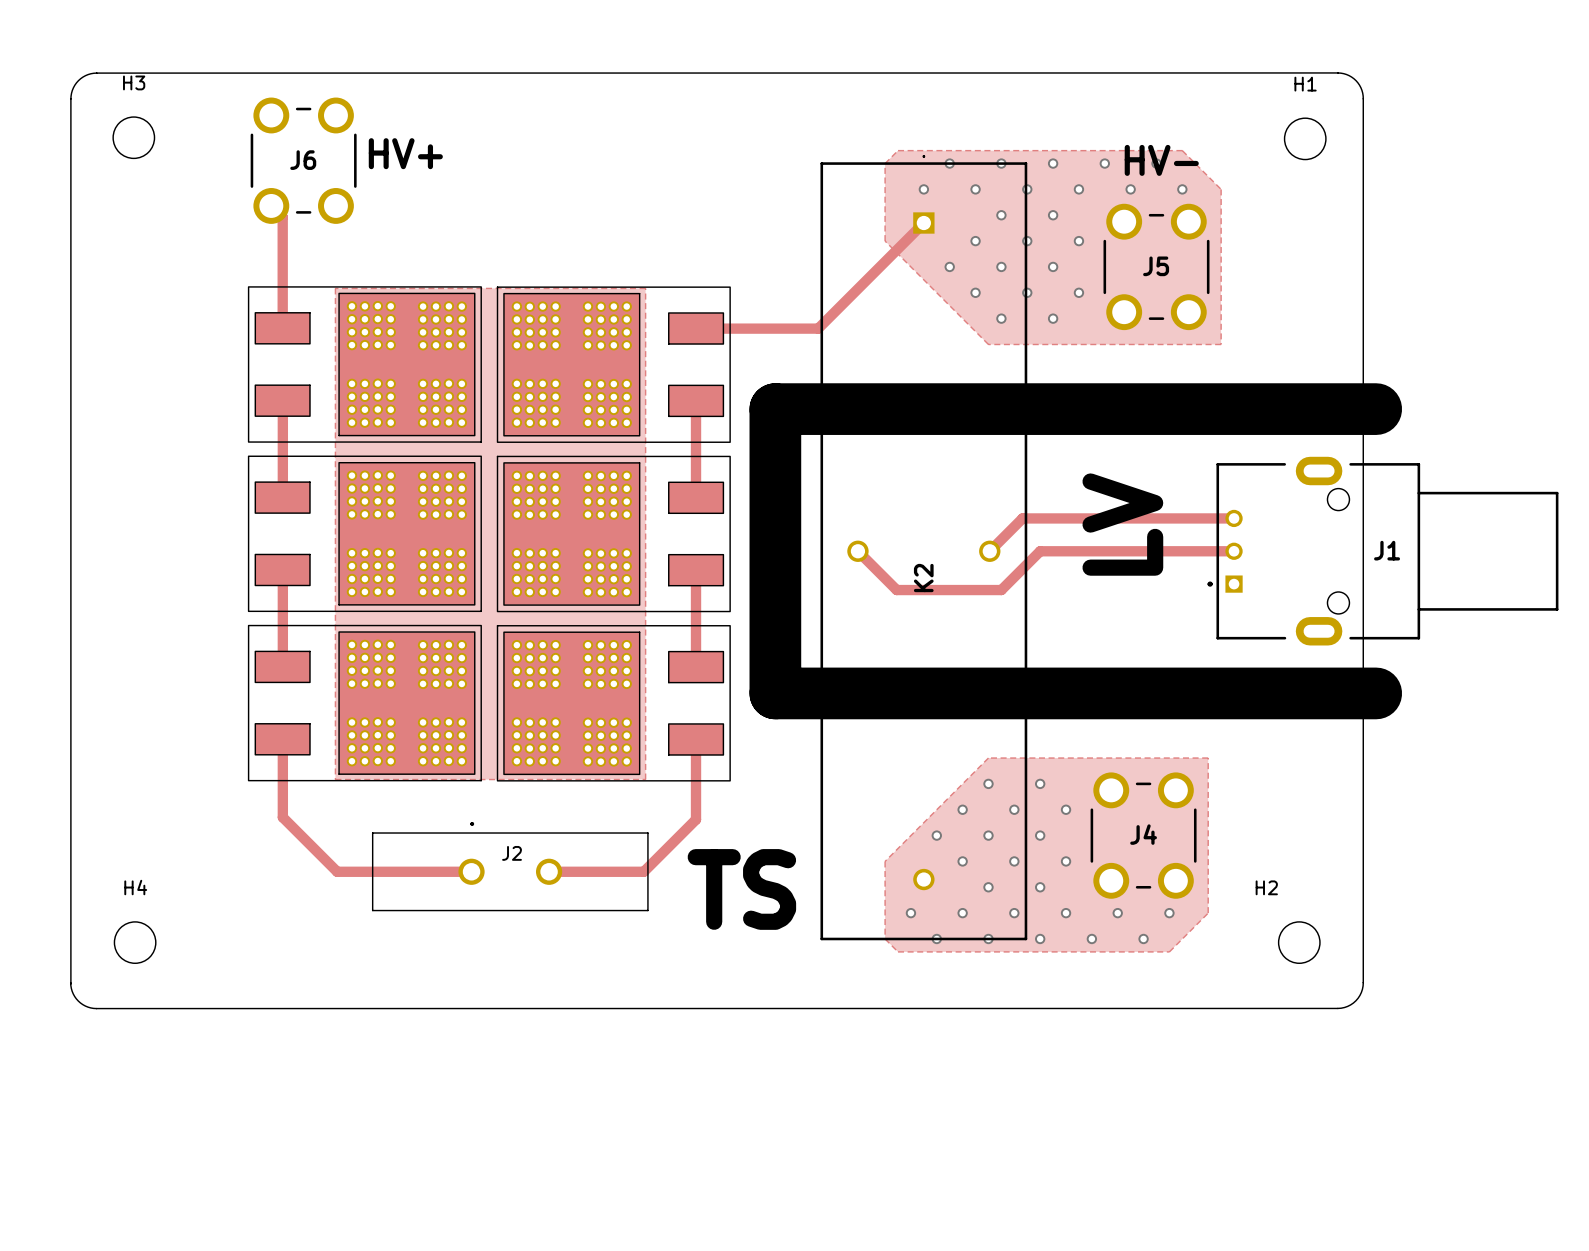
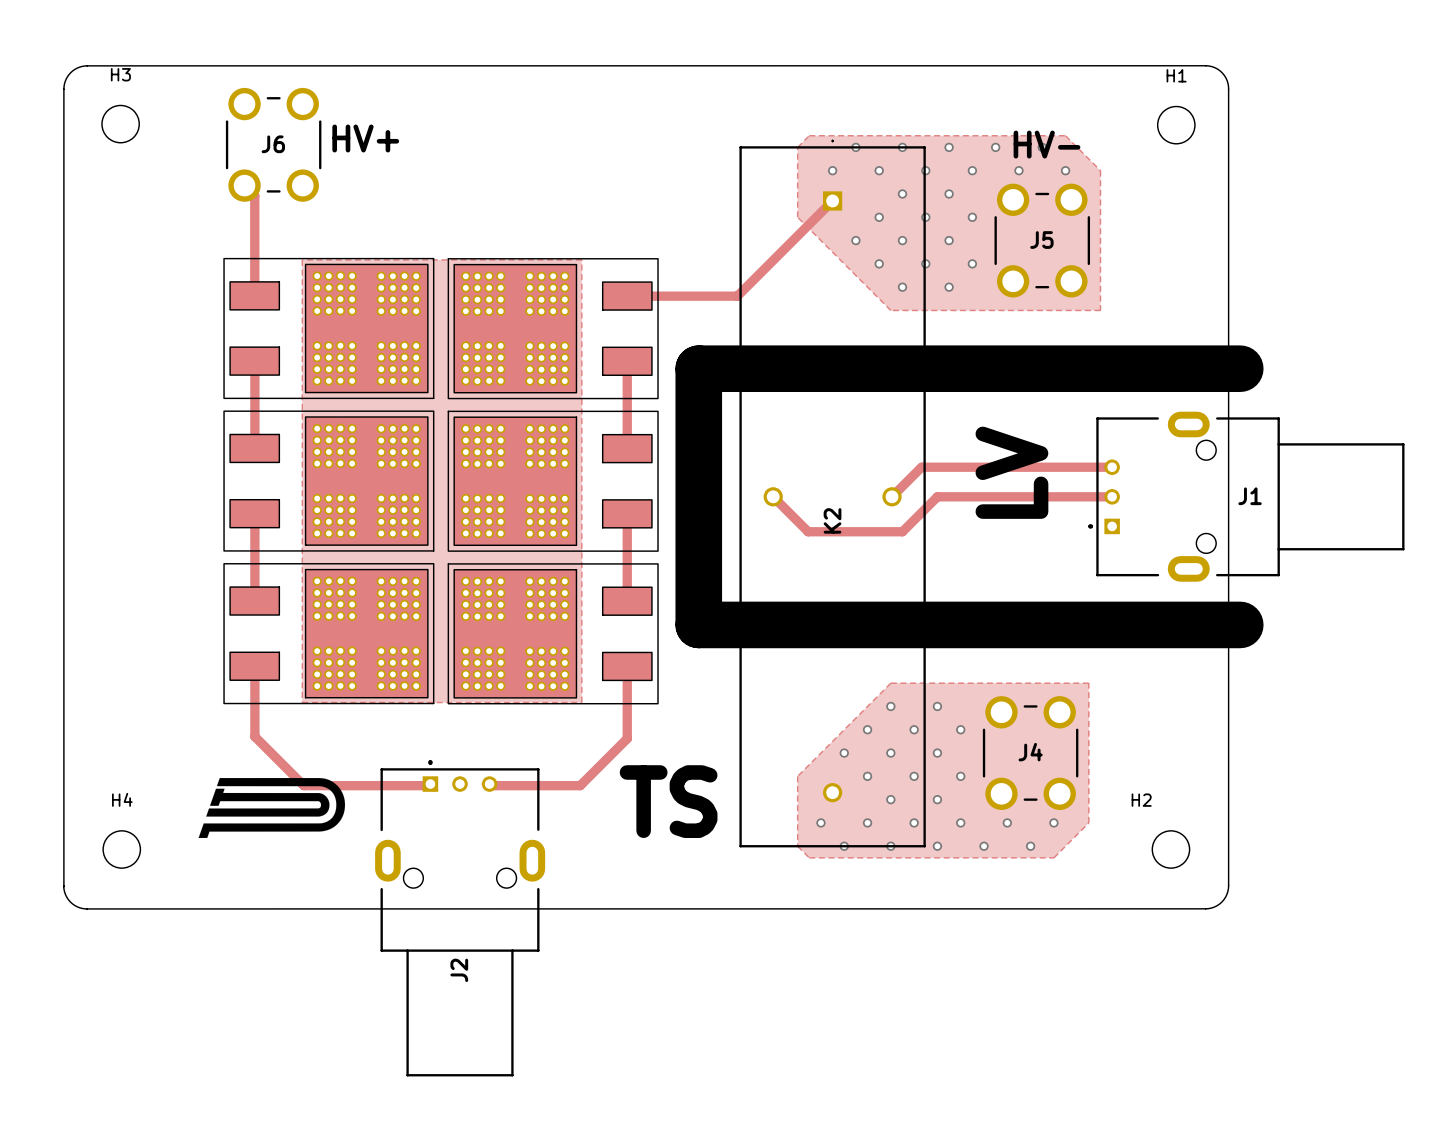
text: J2 (512, 853) -> none
drawing: none -> [198, 777, 346, 839]
part: (510, 866) -> none
J2: none -> (460, 918)

